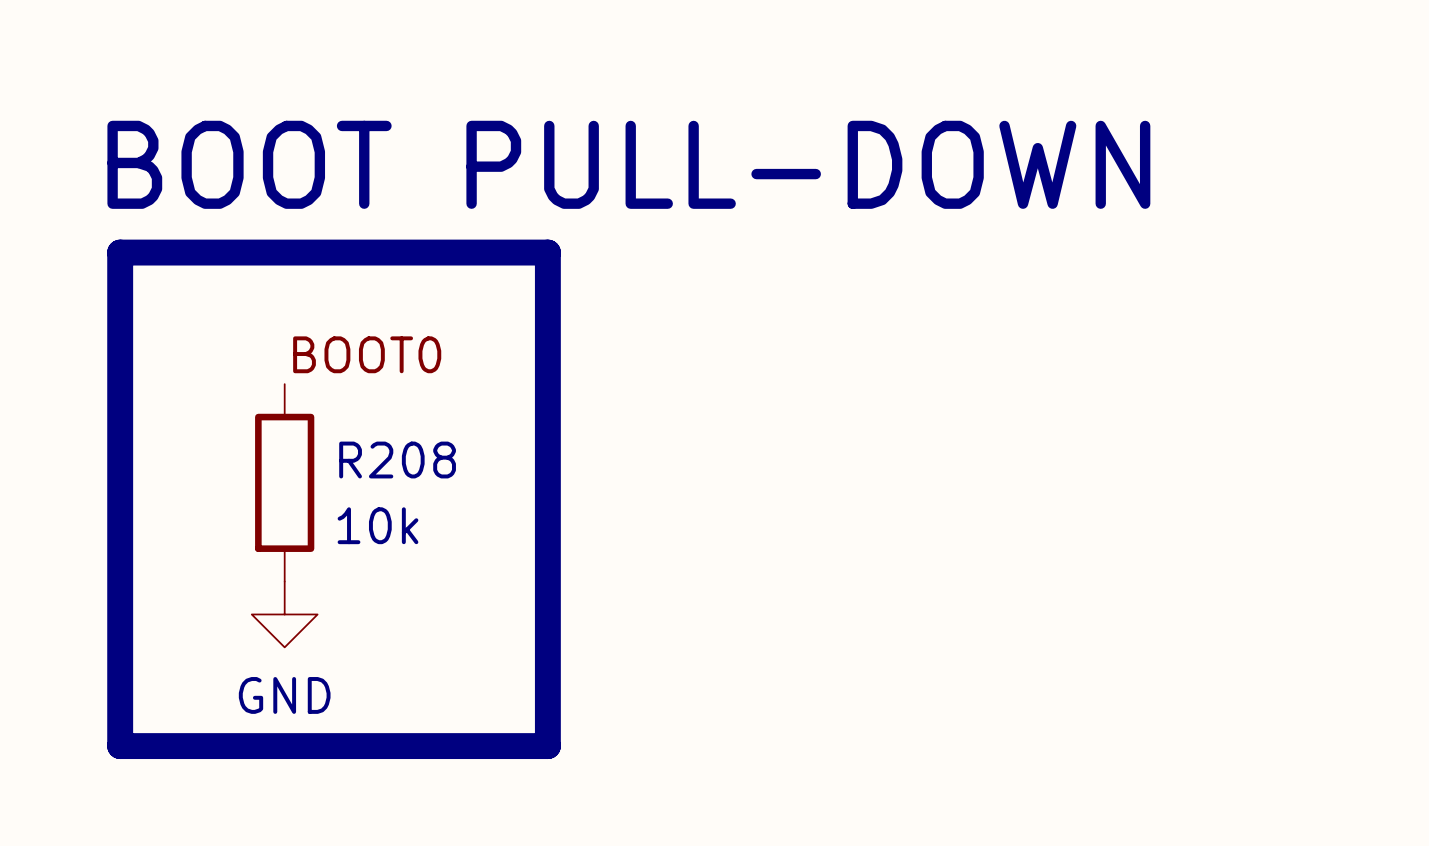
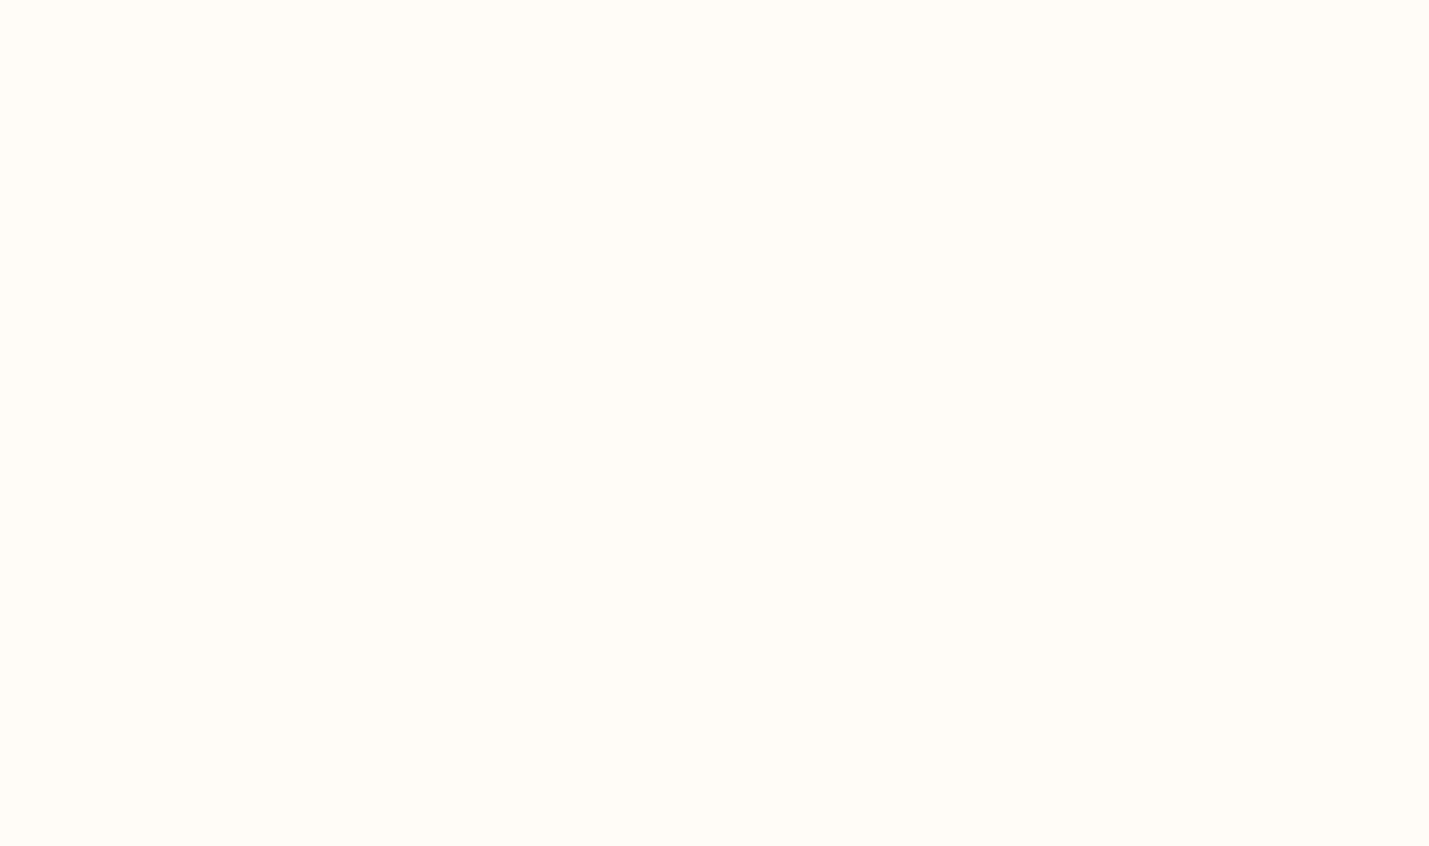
text: BOOT PULL-DOWN (628, 164) -> none
line: (120, 252) (547, 252) (547, 746) (120, 746) (120, 252) -> none
label: BOOT0 (367, 354) -> none
R208: 10k (284, 482) -> none
power symbol: GND (284, 614) -> none

